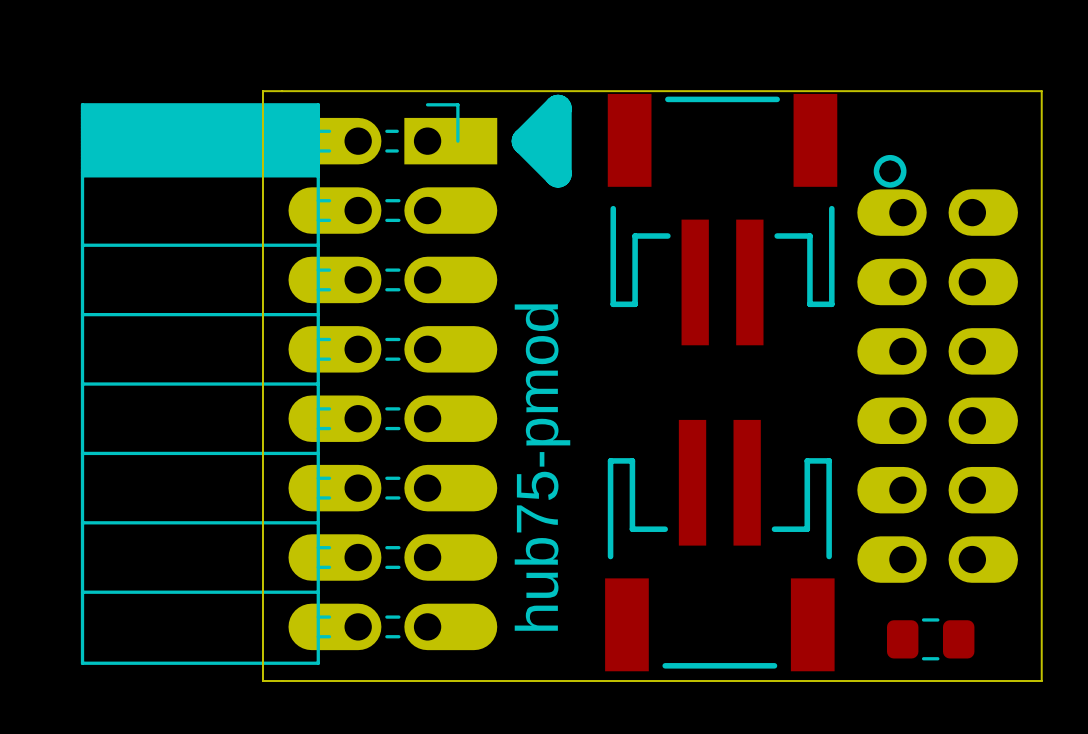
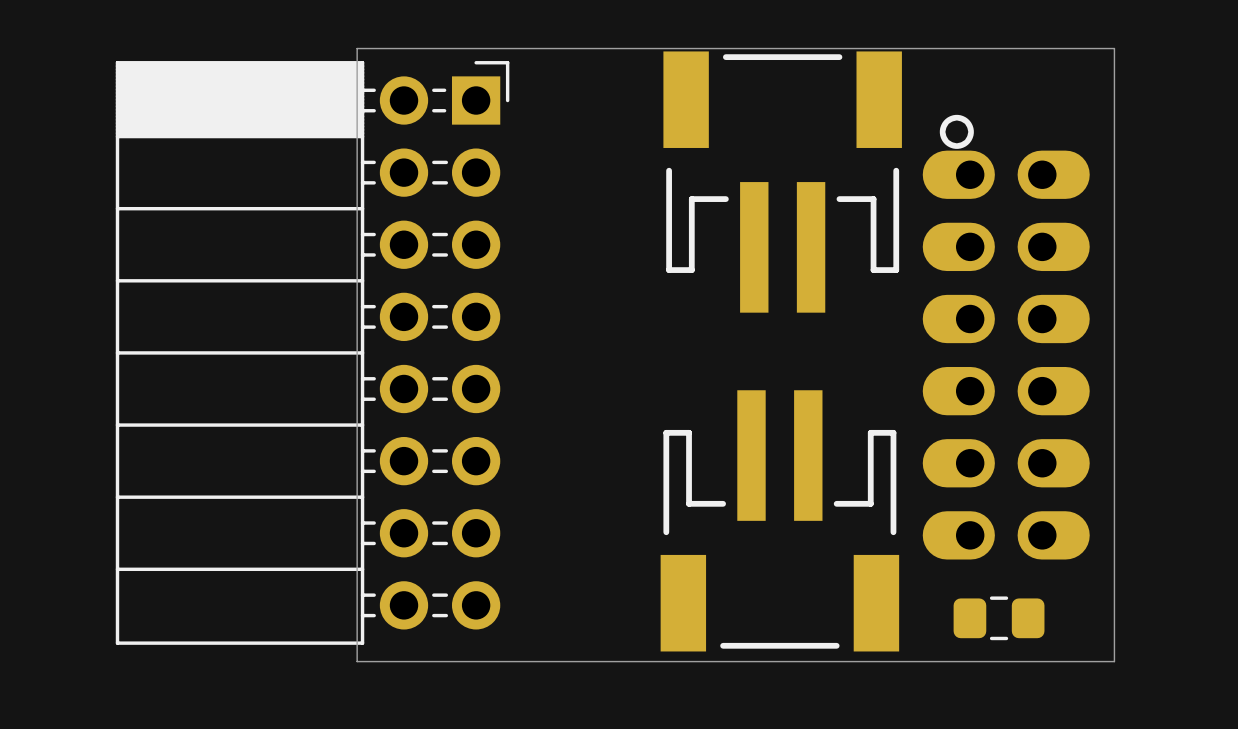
board edge: (313, 91) (262, 91) (262, 681) (313, 681) -> (357, 48) (357, 661)
part footprint: [80, 103, 498, 665] -> [115, 61, 510, 645]
line: (558, 108) (558, 173) (525, 141) (558, 108) -> none
text: hub75-pmod (542, 467) -> none

